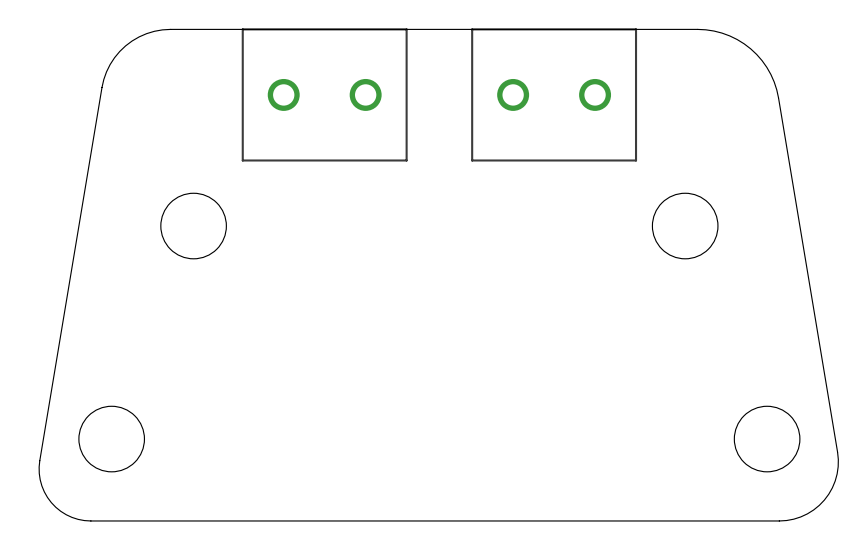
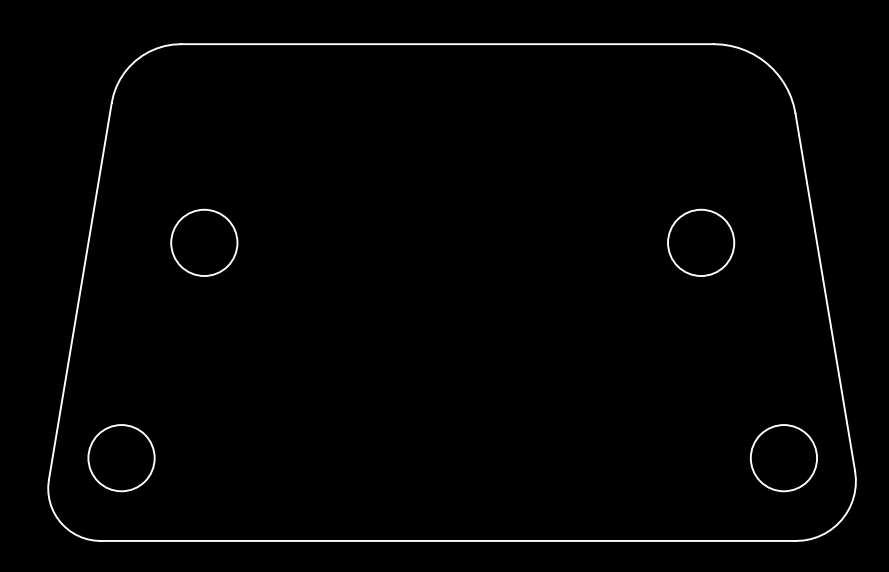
part: (324, 94) -> none
part: (554, 94) -> none

